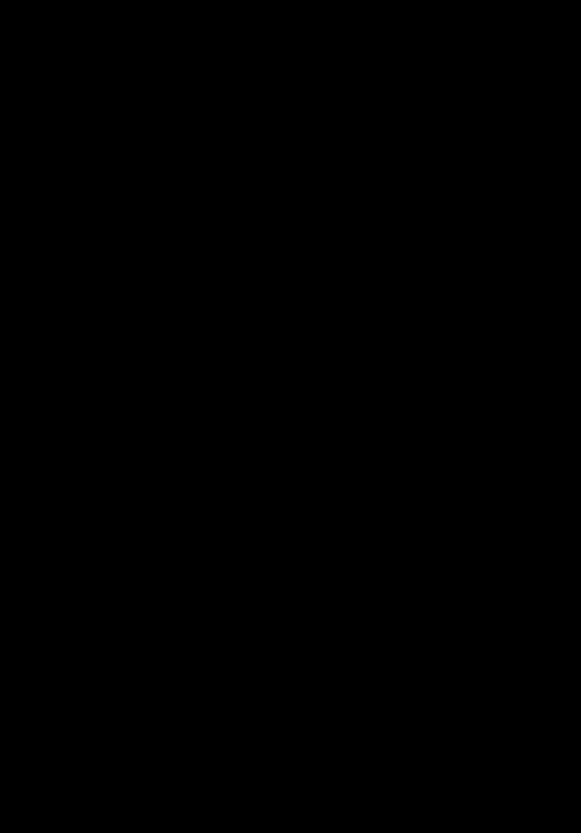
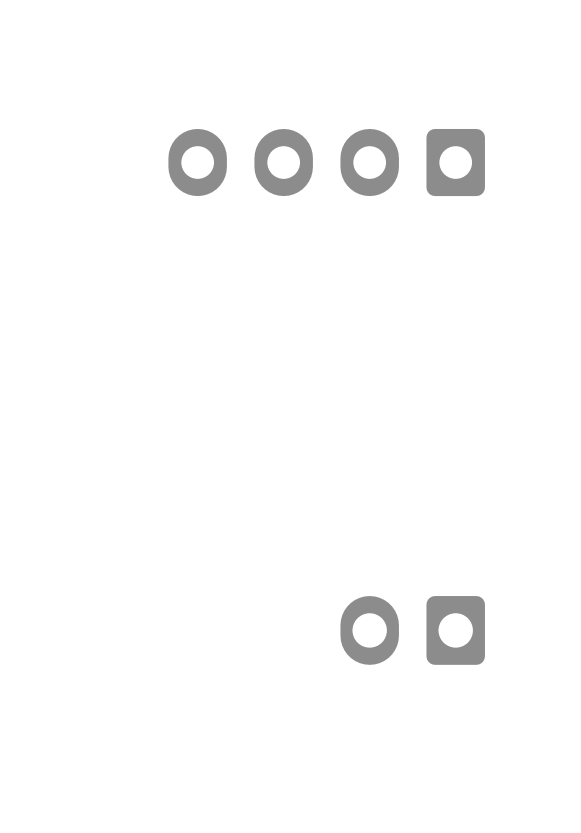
part: none -> (326, 162)
part: none -> (412, 630)

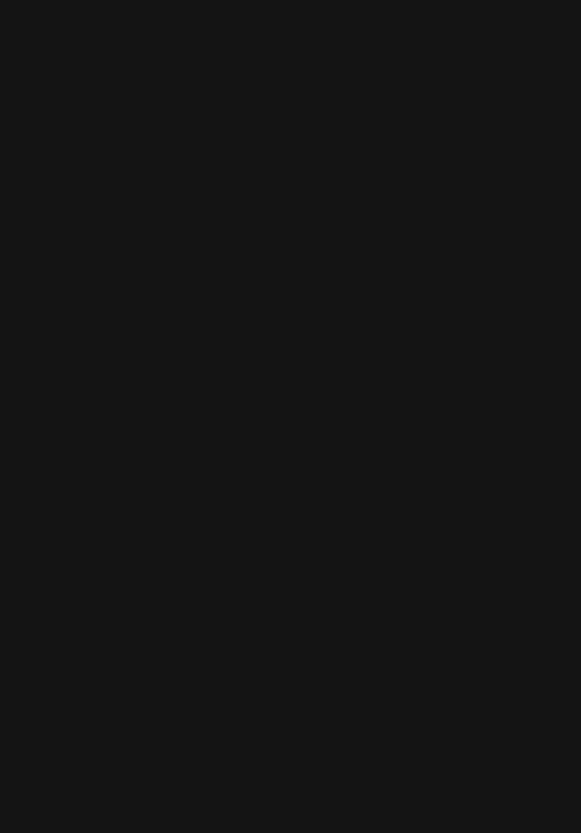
part: (326, 162) -> none
part: (412, 630) -> none

